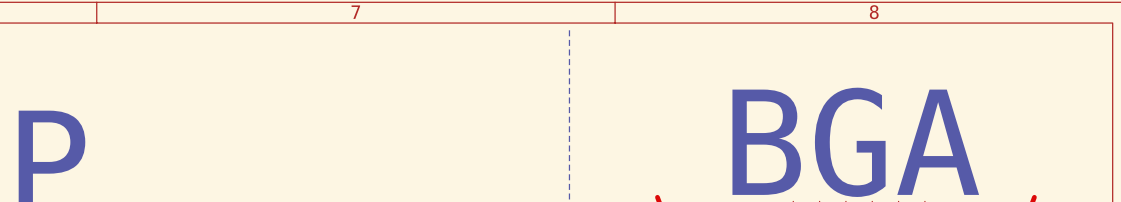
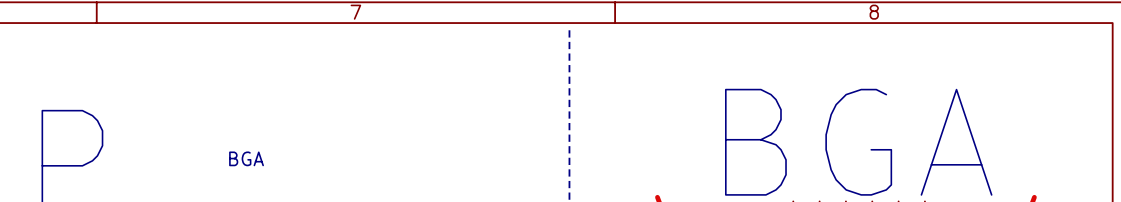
text: none -> BGA (246, 158)

